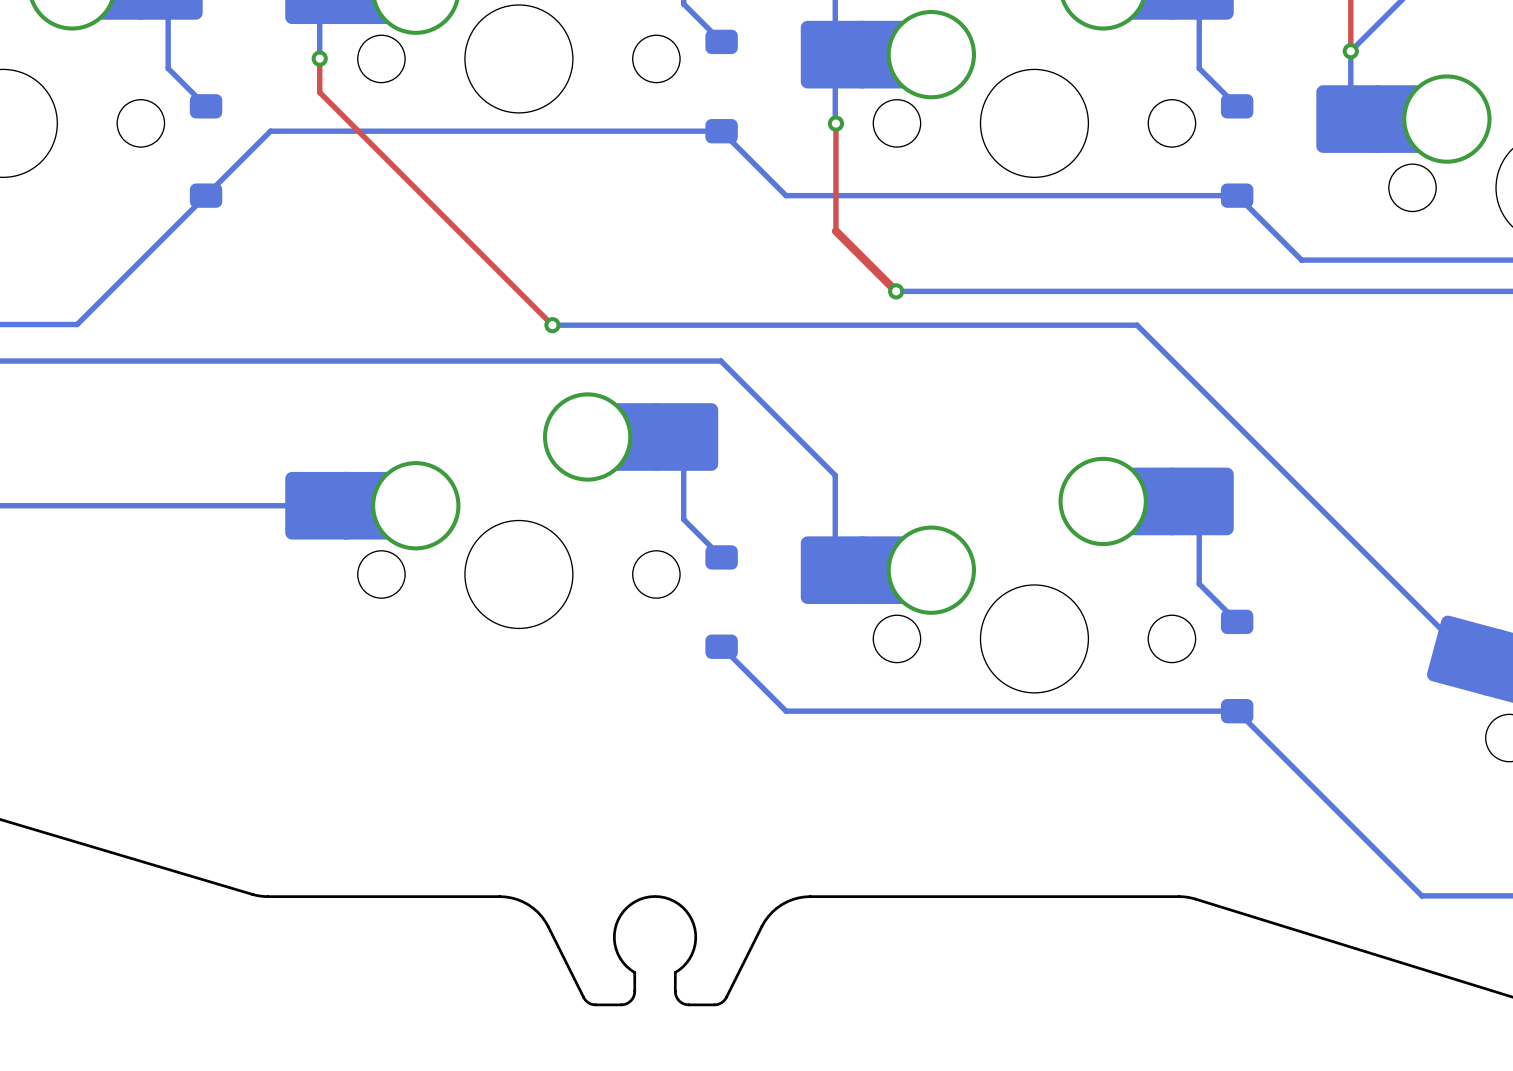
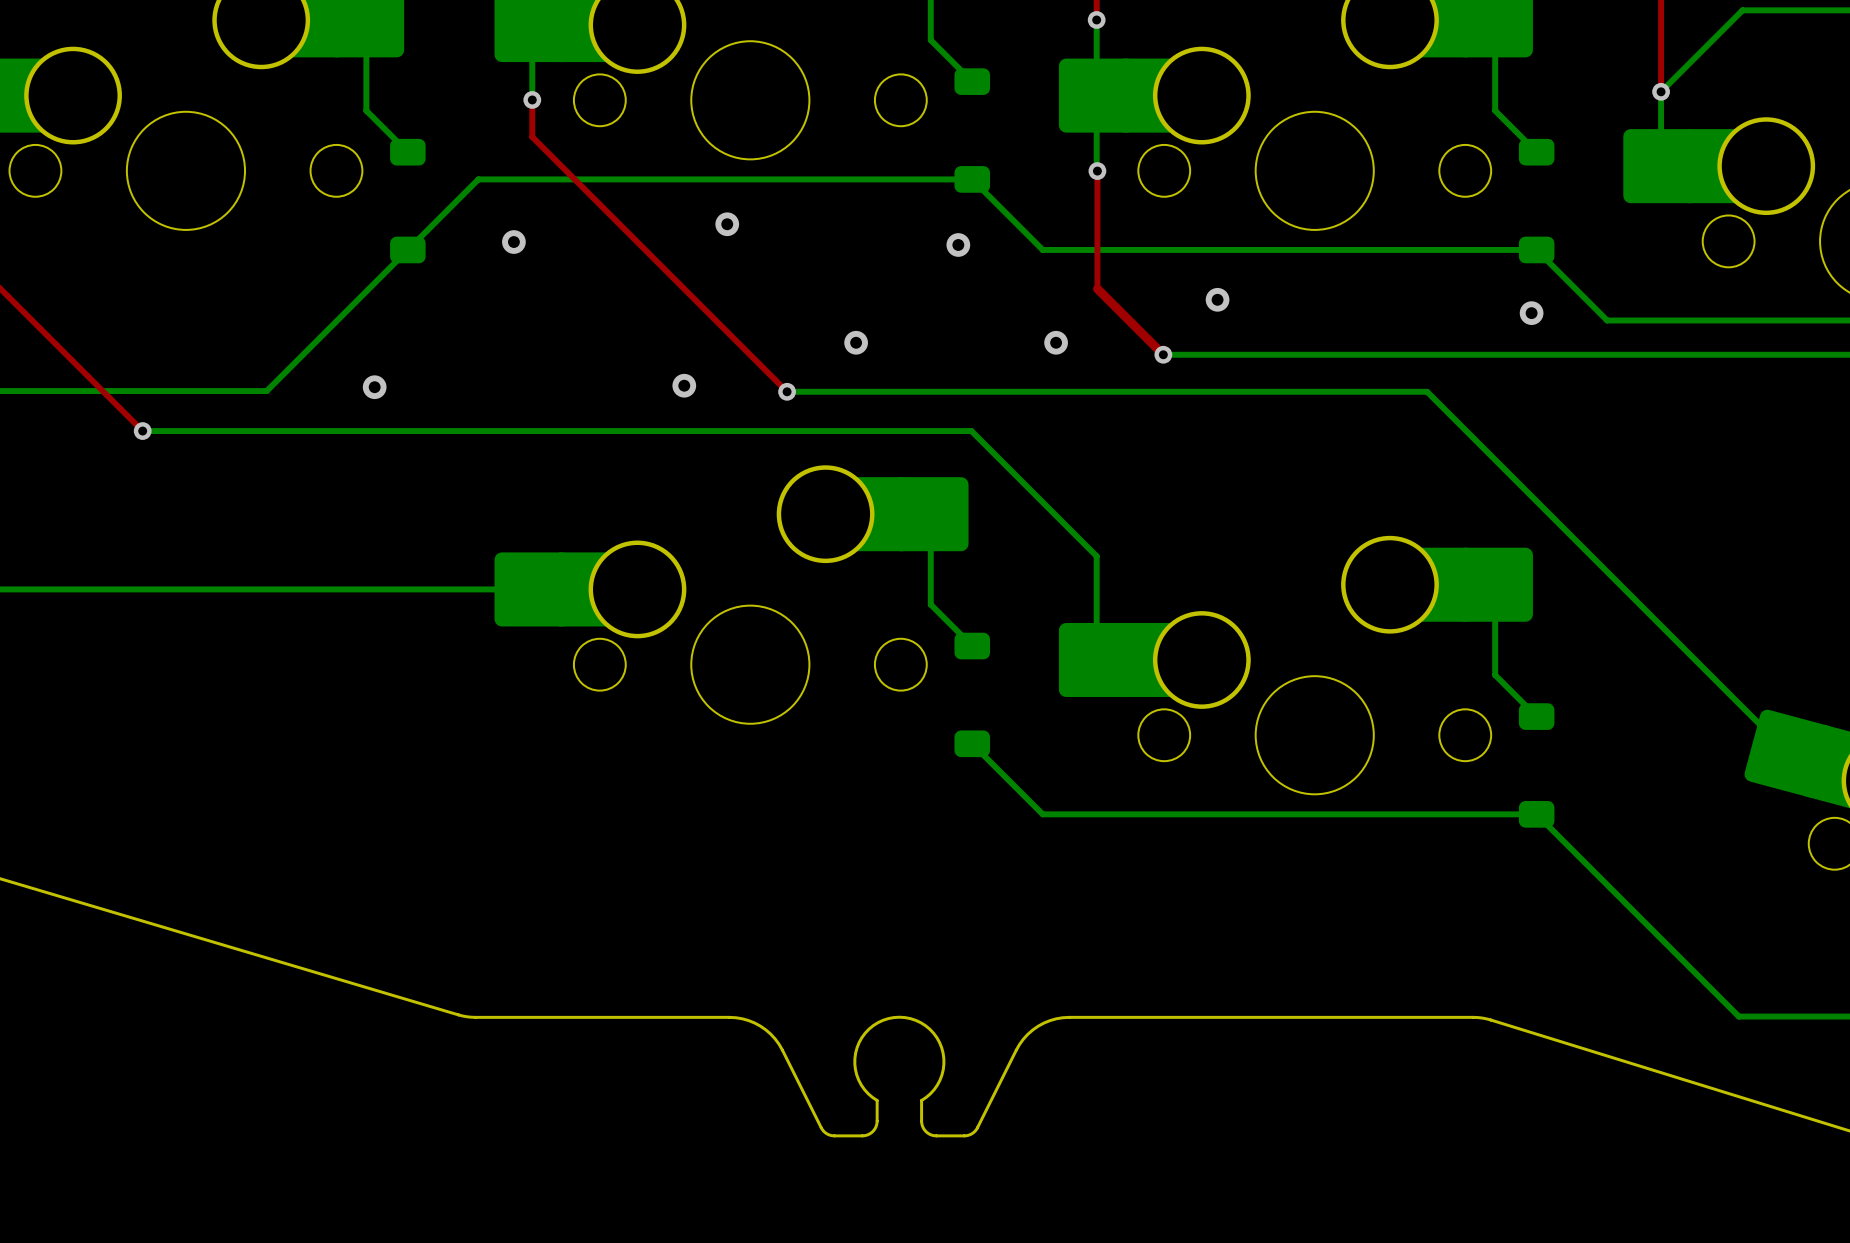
via: none -> (727, 224)
via: none -> (513, 242)
via: none -> (958, 244)
via: none -> (1217, 299)
via: none -> (1531, 313)
via: none -> (856, 342)
via: none -> (1056, 342)
via: none -> (684, 385)
via: none -> (374, 387)

